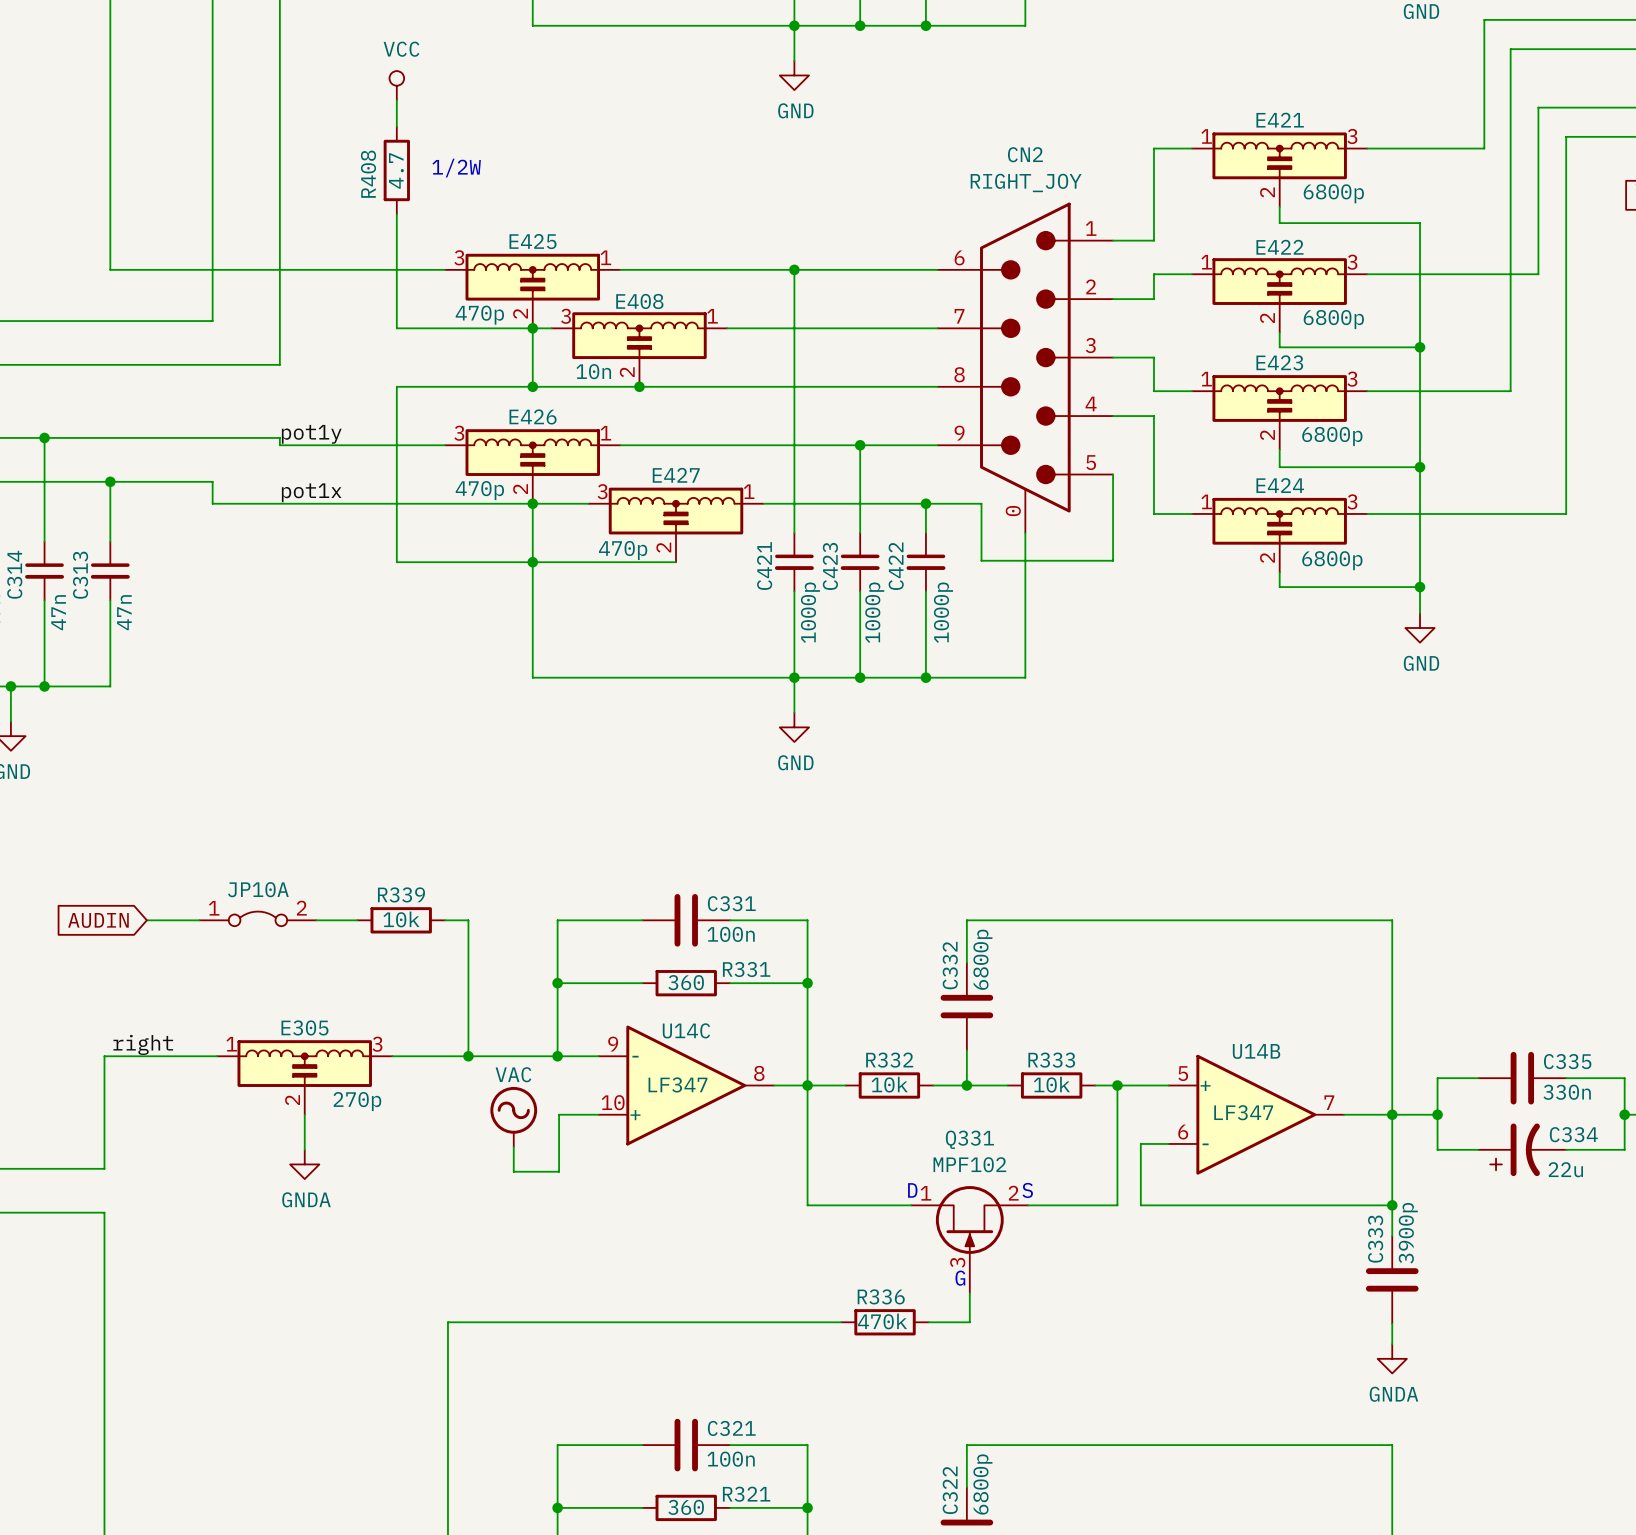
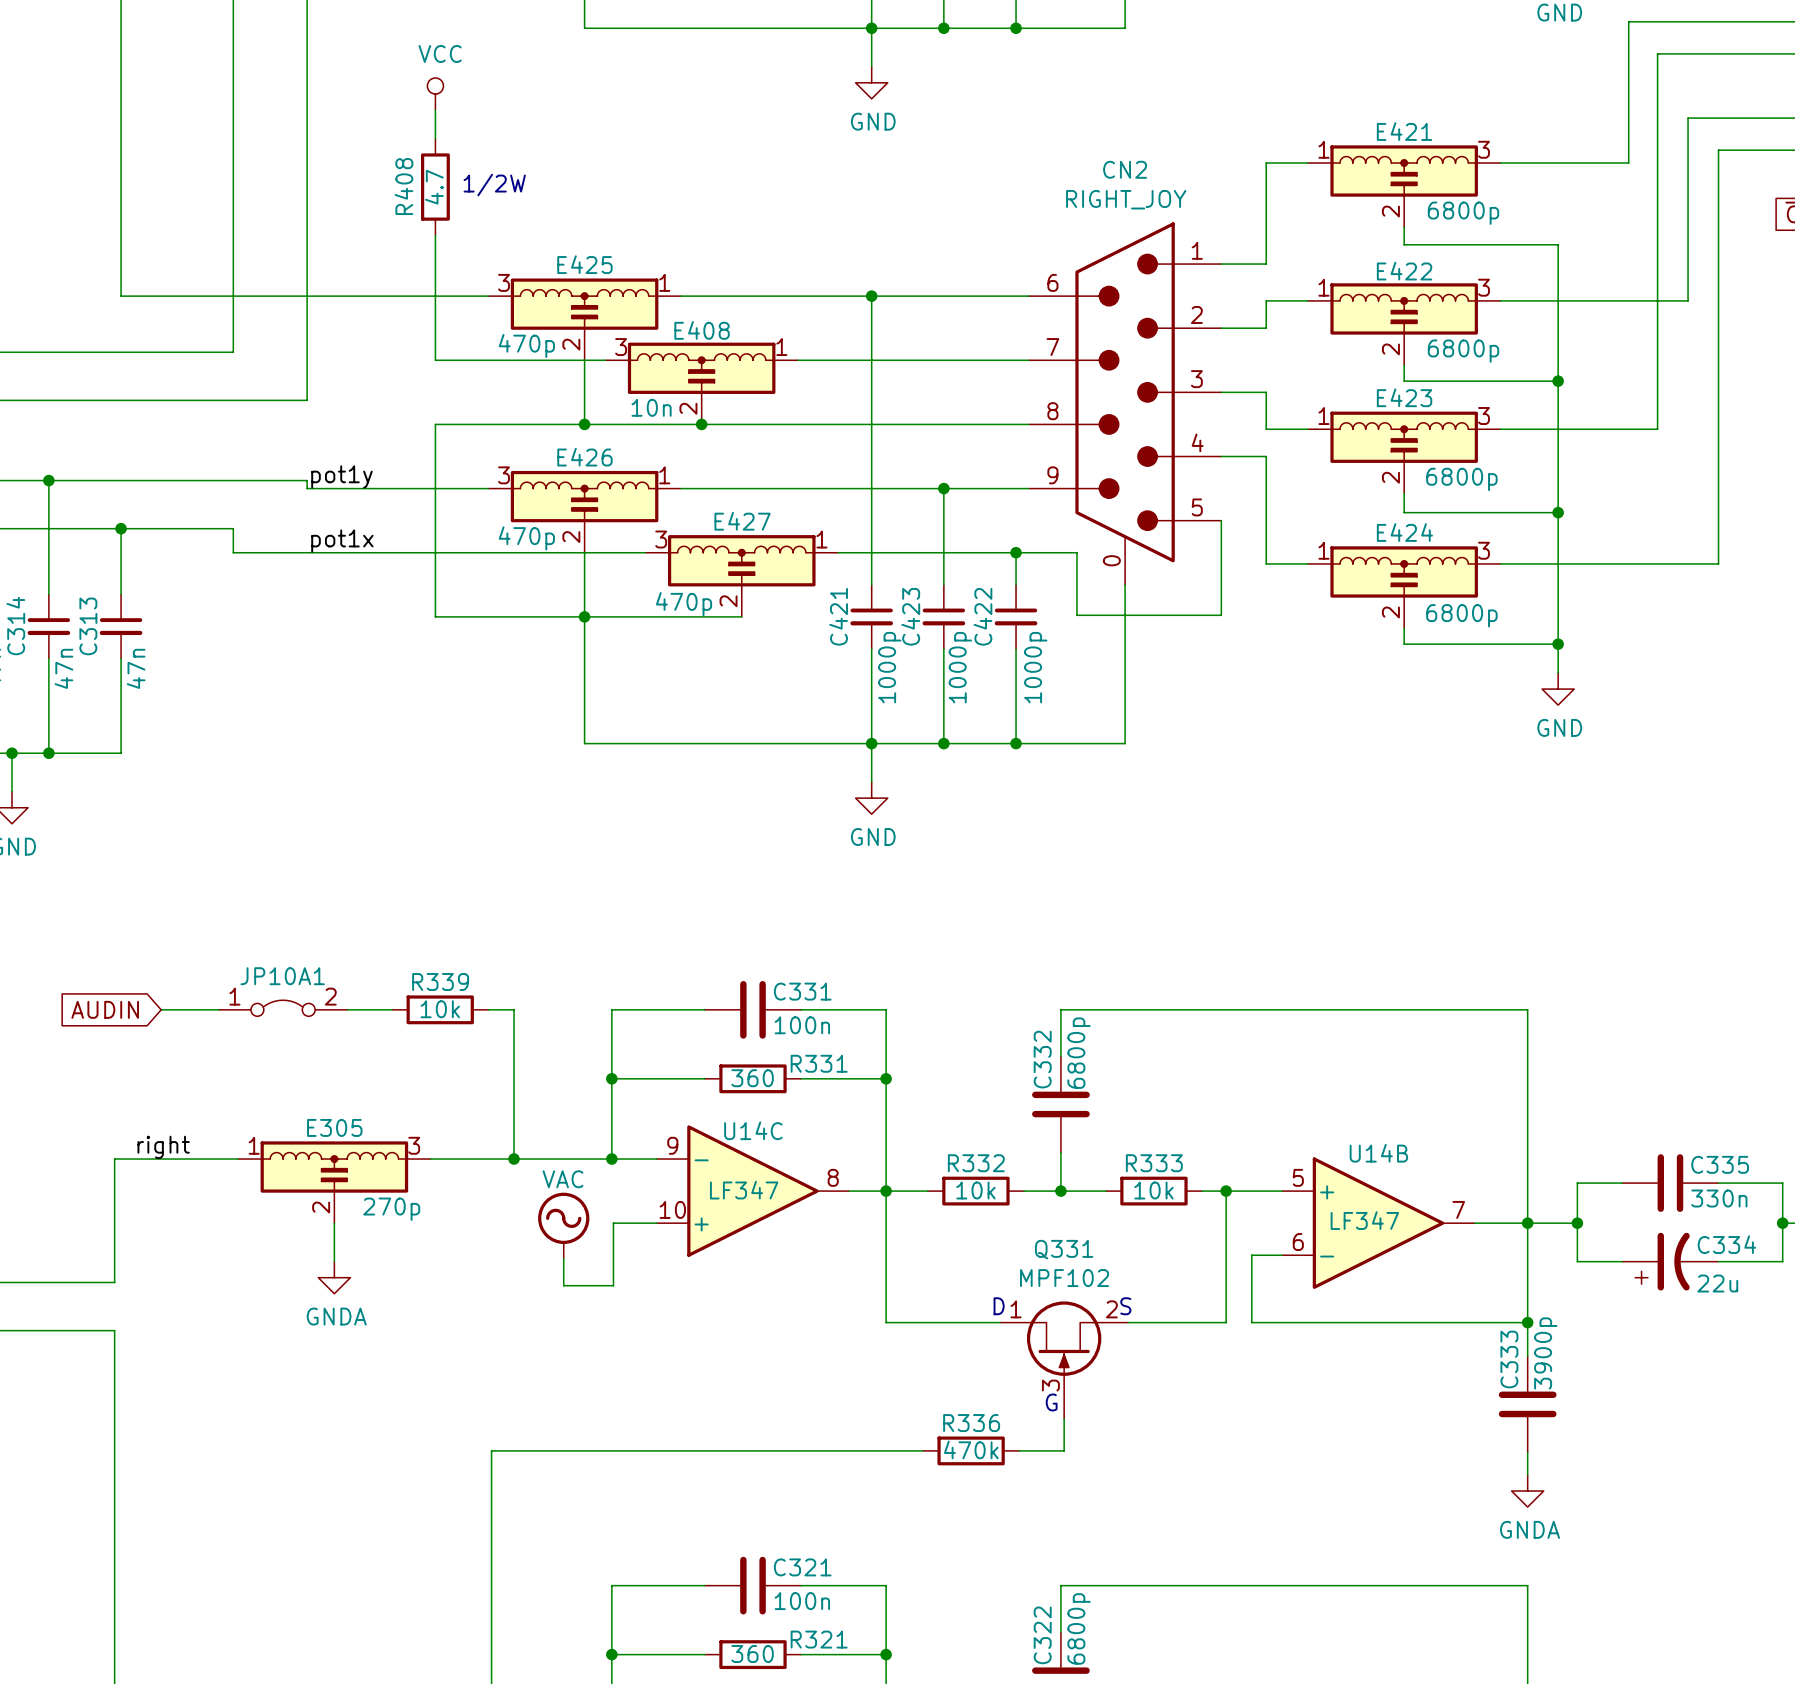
junction: (532, 328) -> none
junction: (532, 503) -> none
JP10A name: JP10A (258, 889) -> JP10A1 (282, 976)

